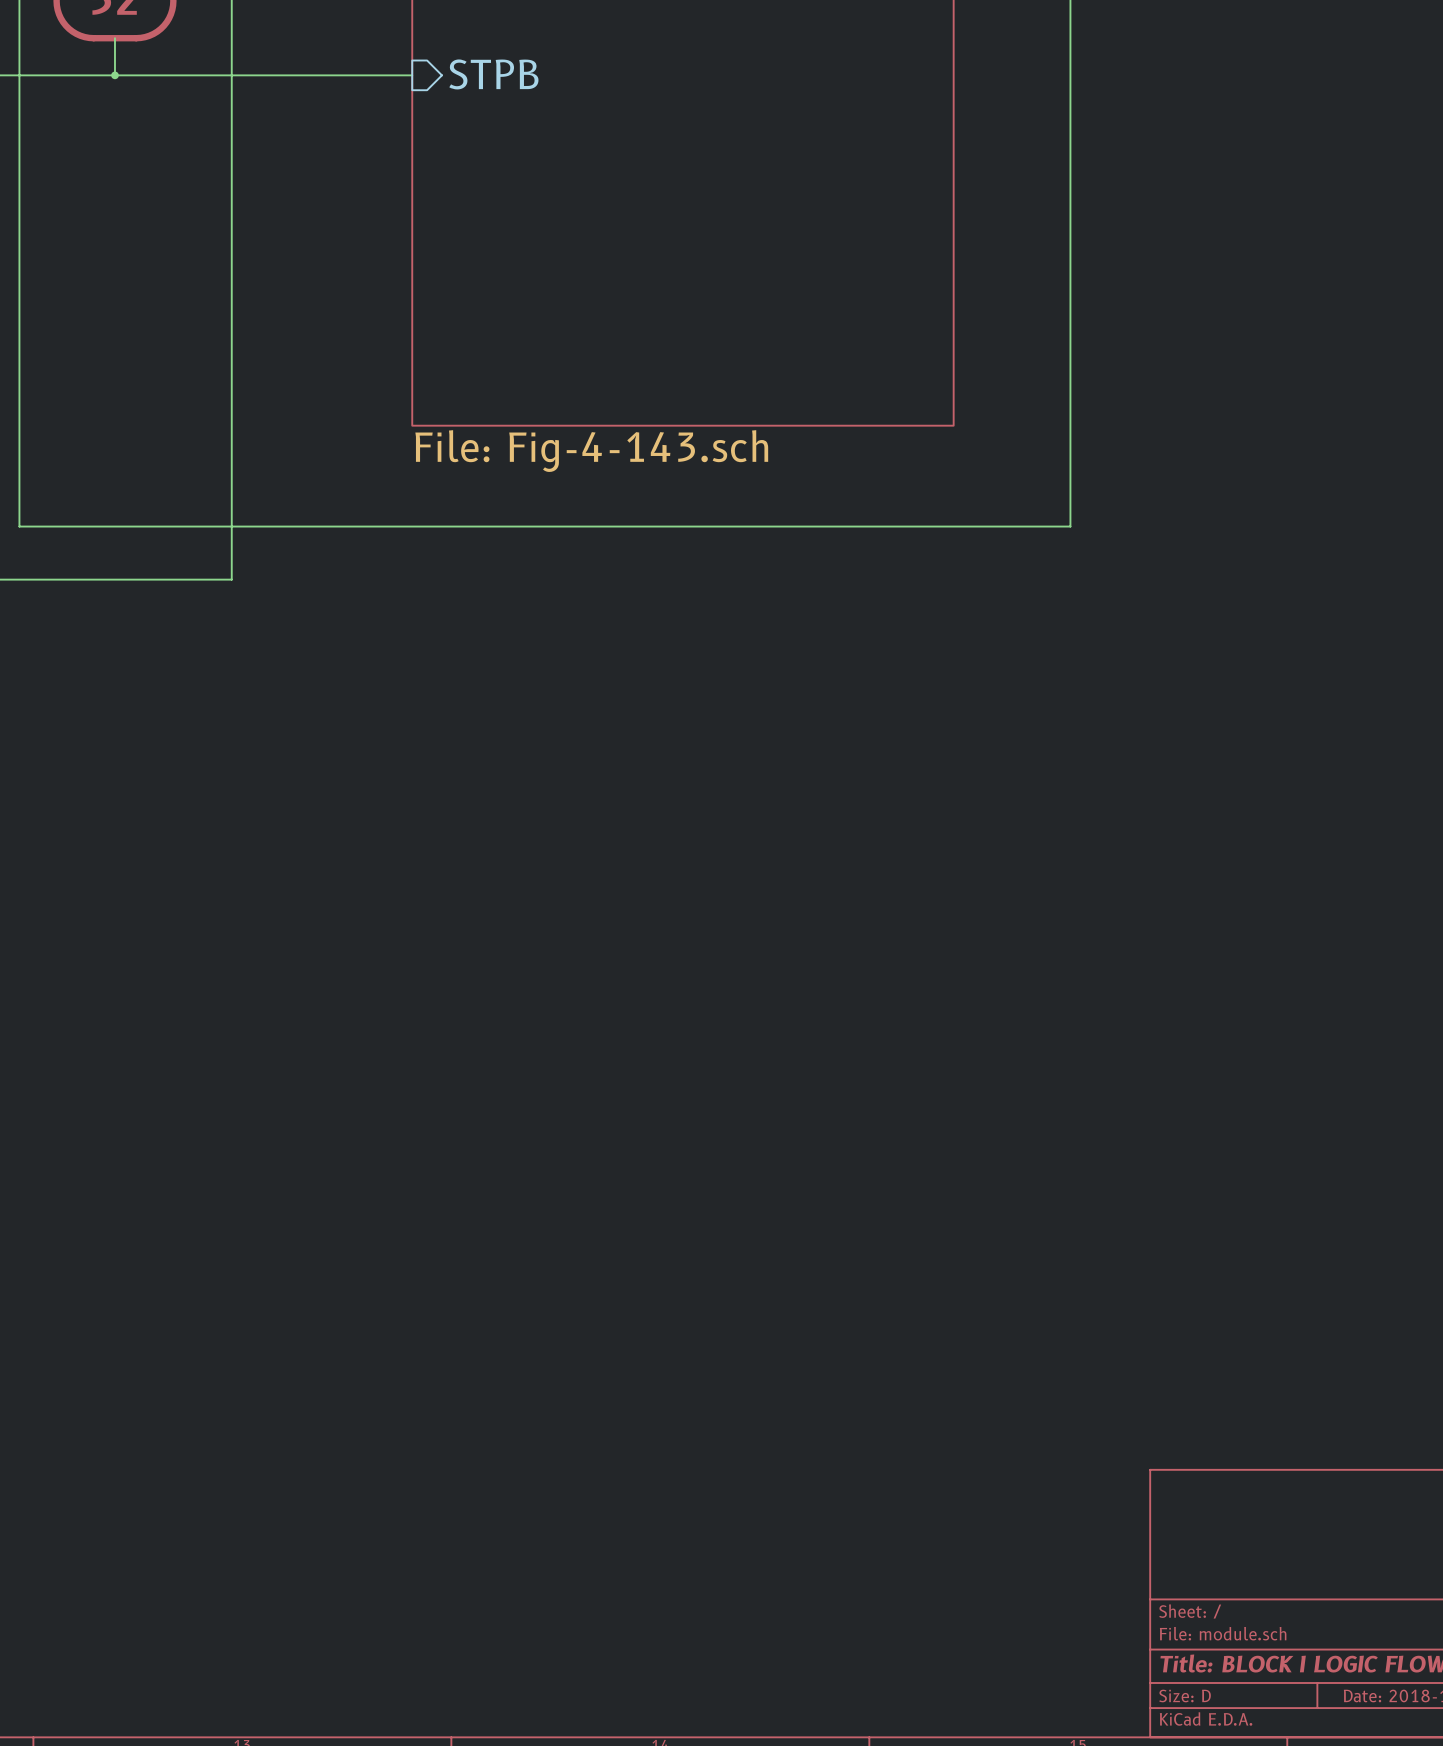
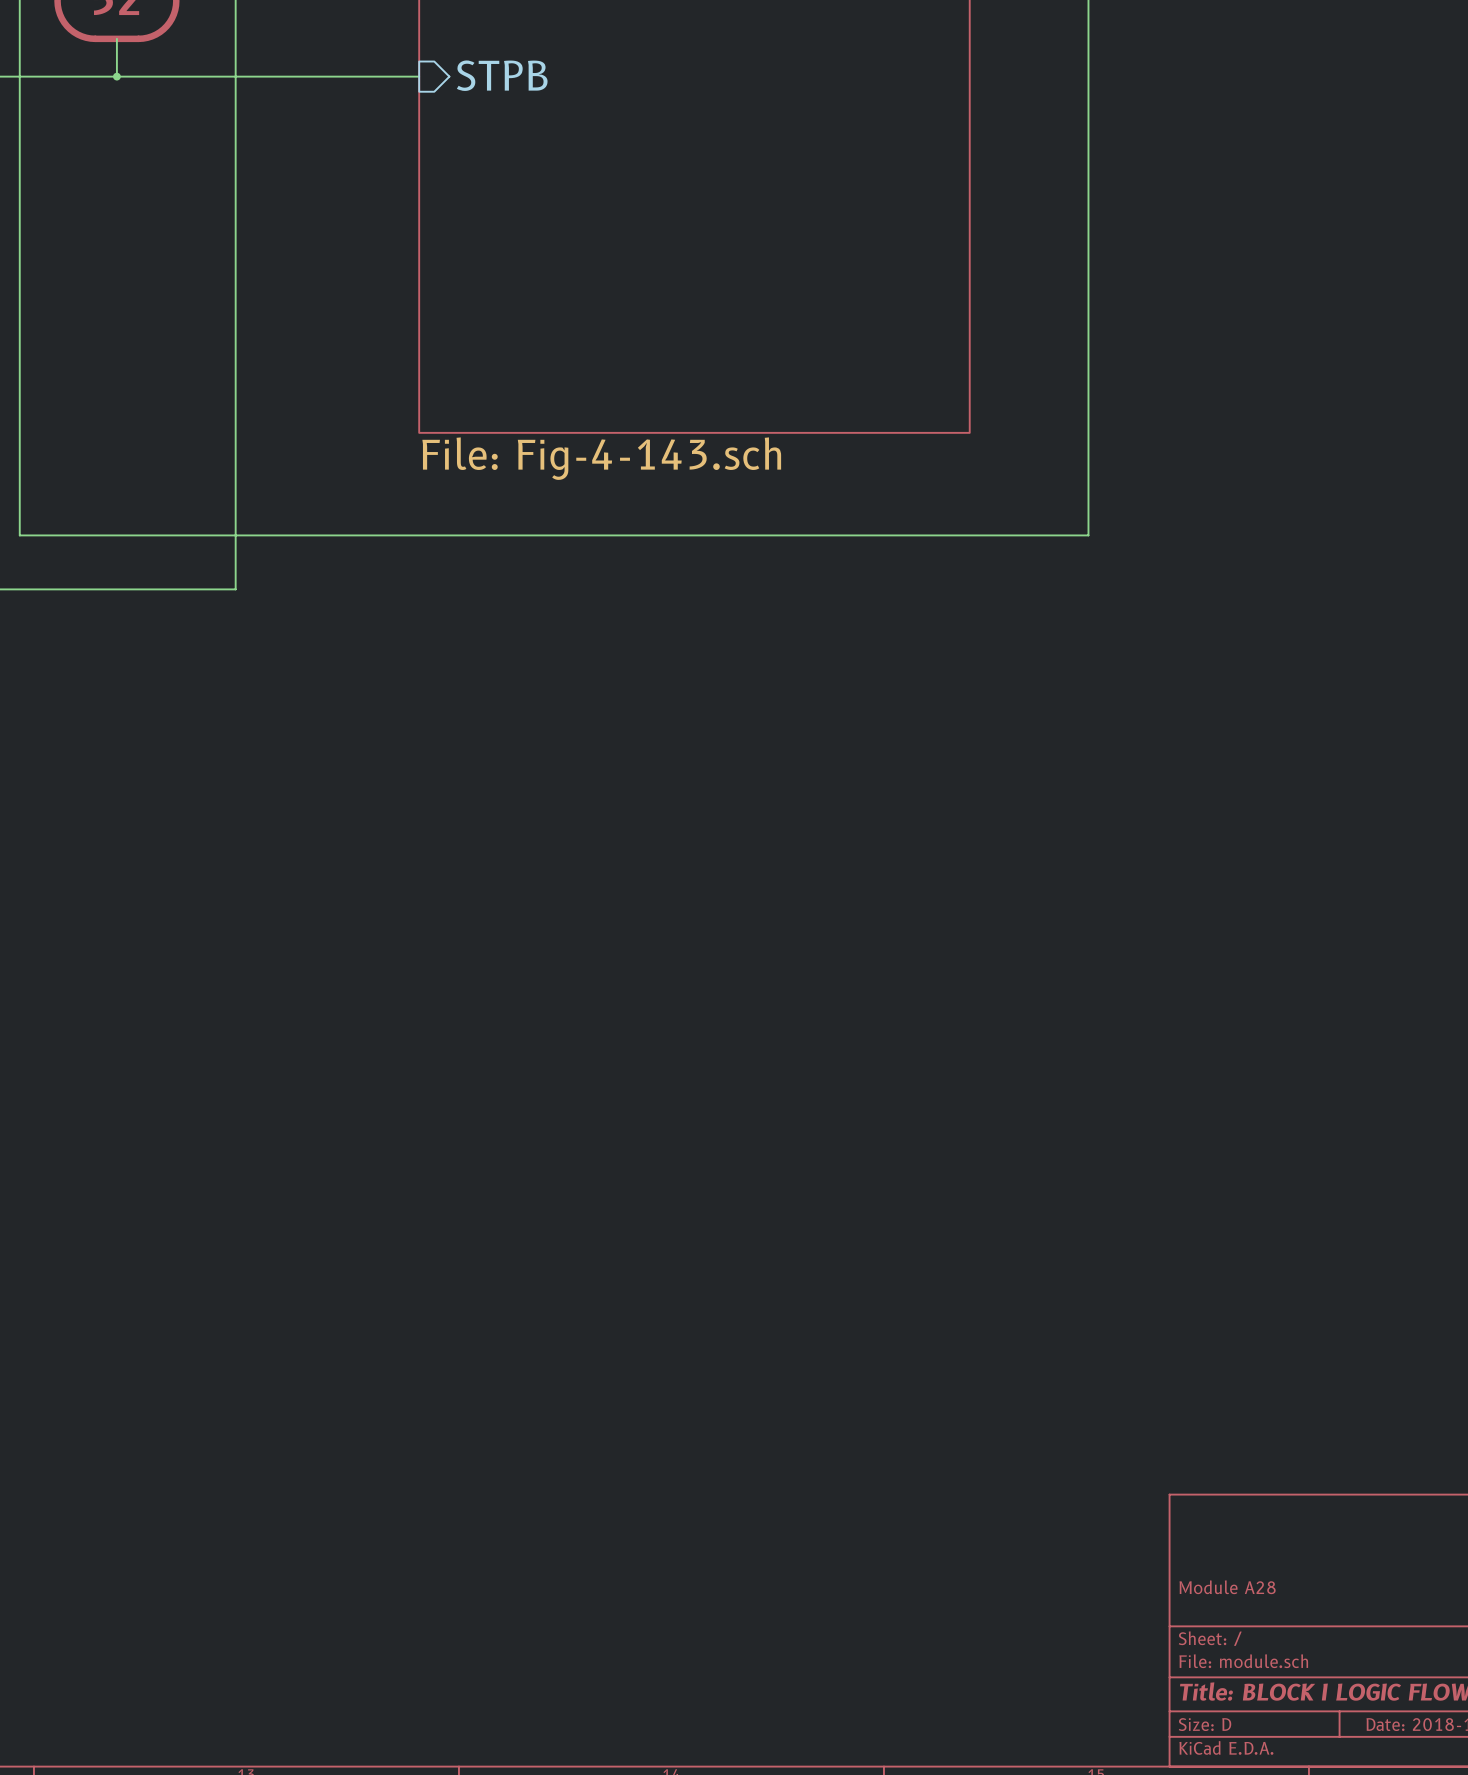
title block: none -> Module A28 (1227, 1587)

